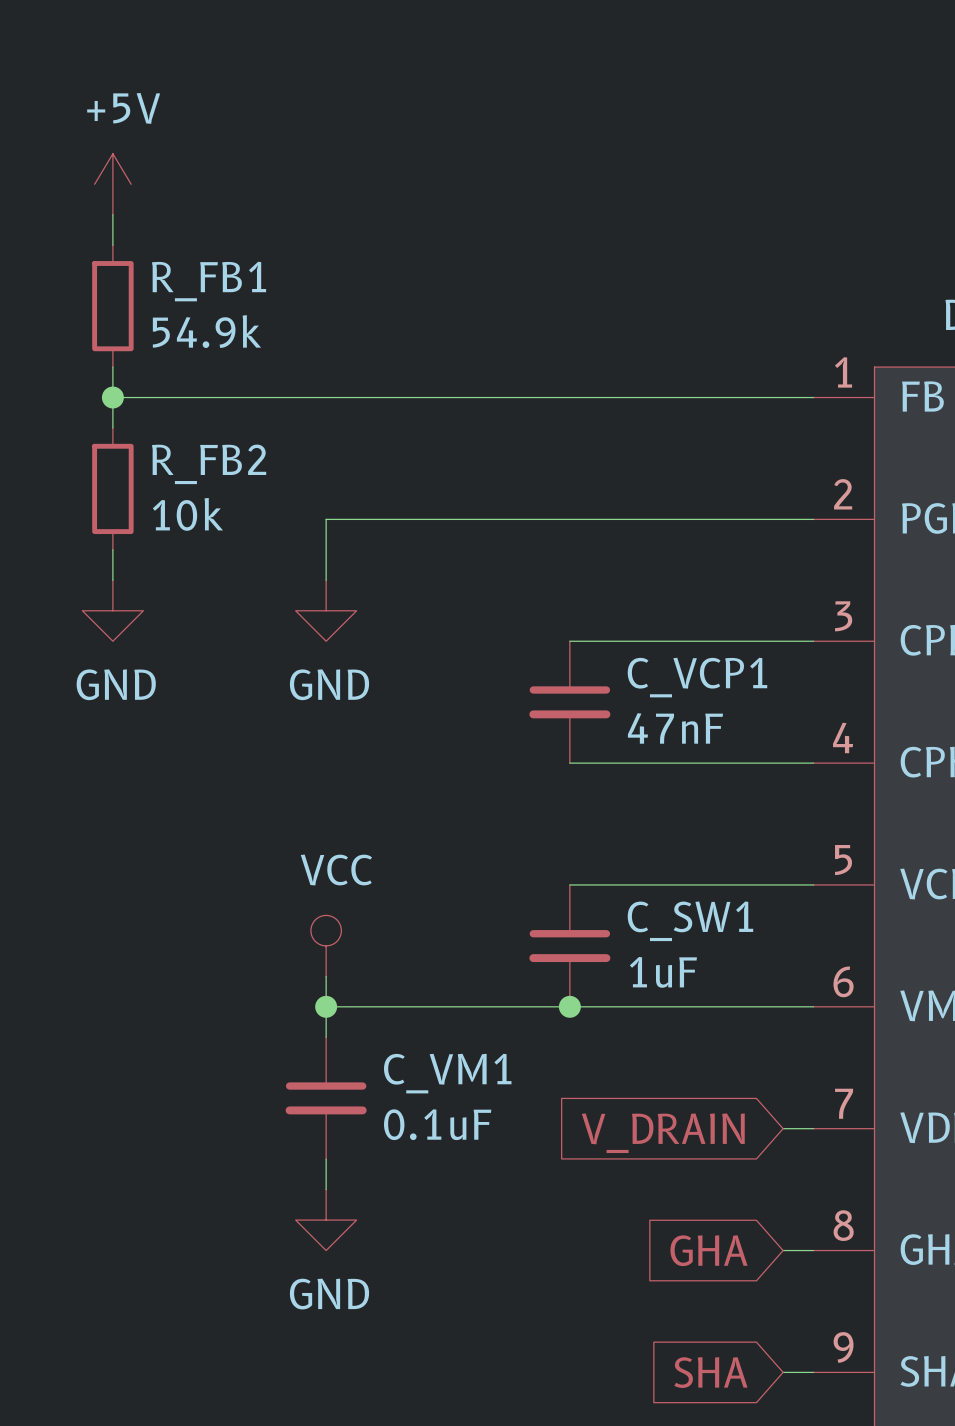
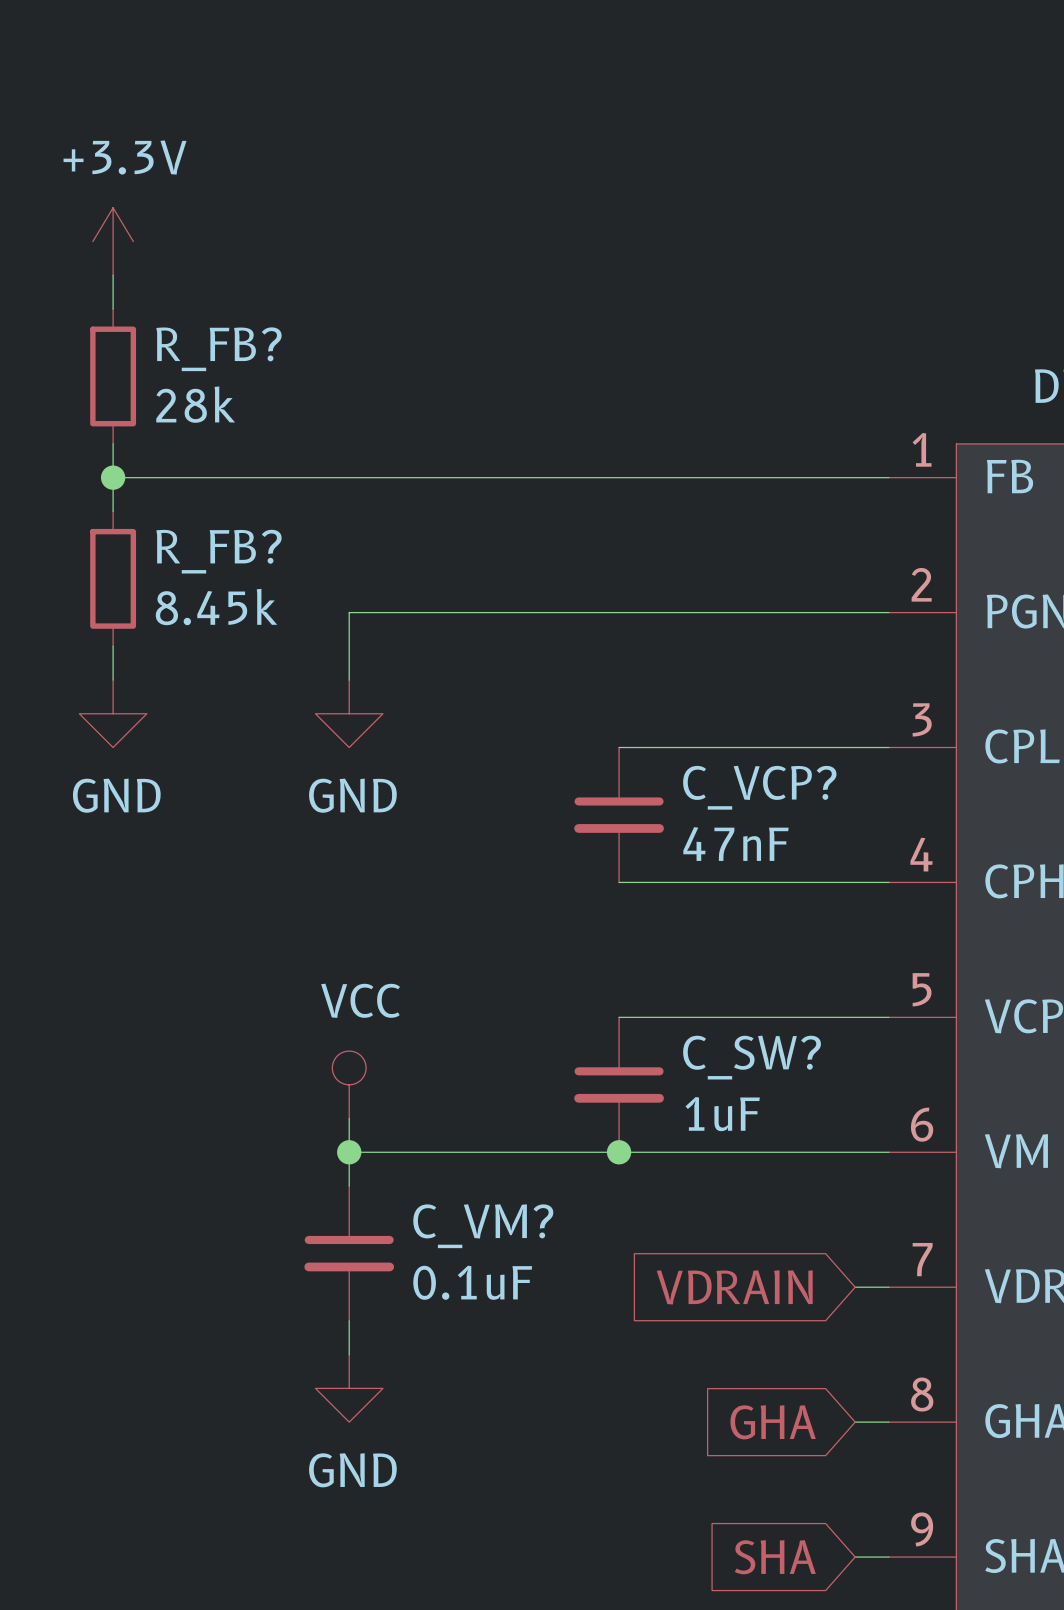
power symbol: +5V (112, 184) -> +3.3V (113, 241)
R_FB1 name: R_FB1 (209, 281) -> R_FB? (218, 349)
R_FB1 value: 54.9k (206, 331) -> 28k (195, 404)
R_FB2 name: R_FB2 (209, 464) -> R_FB? (218, 551)
R_FB2 value: 10k (187, 514) -> 8.45k (216, 607)
C_VCP1 name: C_VCP1 (697, 677) -> C_VCP? (759, 787)
C_SW1 name: C_SW1 (690, 921) -> C_SW? (752, 1057)
C_VM1 name: C_VM1 (447, 1073) -> C_VM? (483, 1226)
global label: V_DRAIN (663, 1133) -> VDRAIN (734, 1287)

